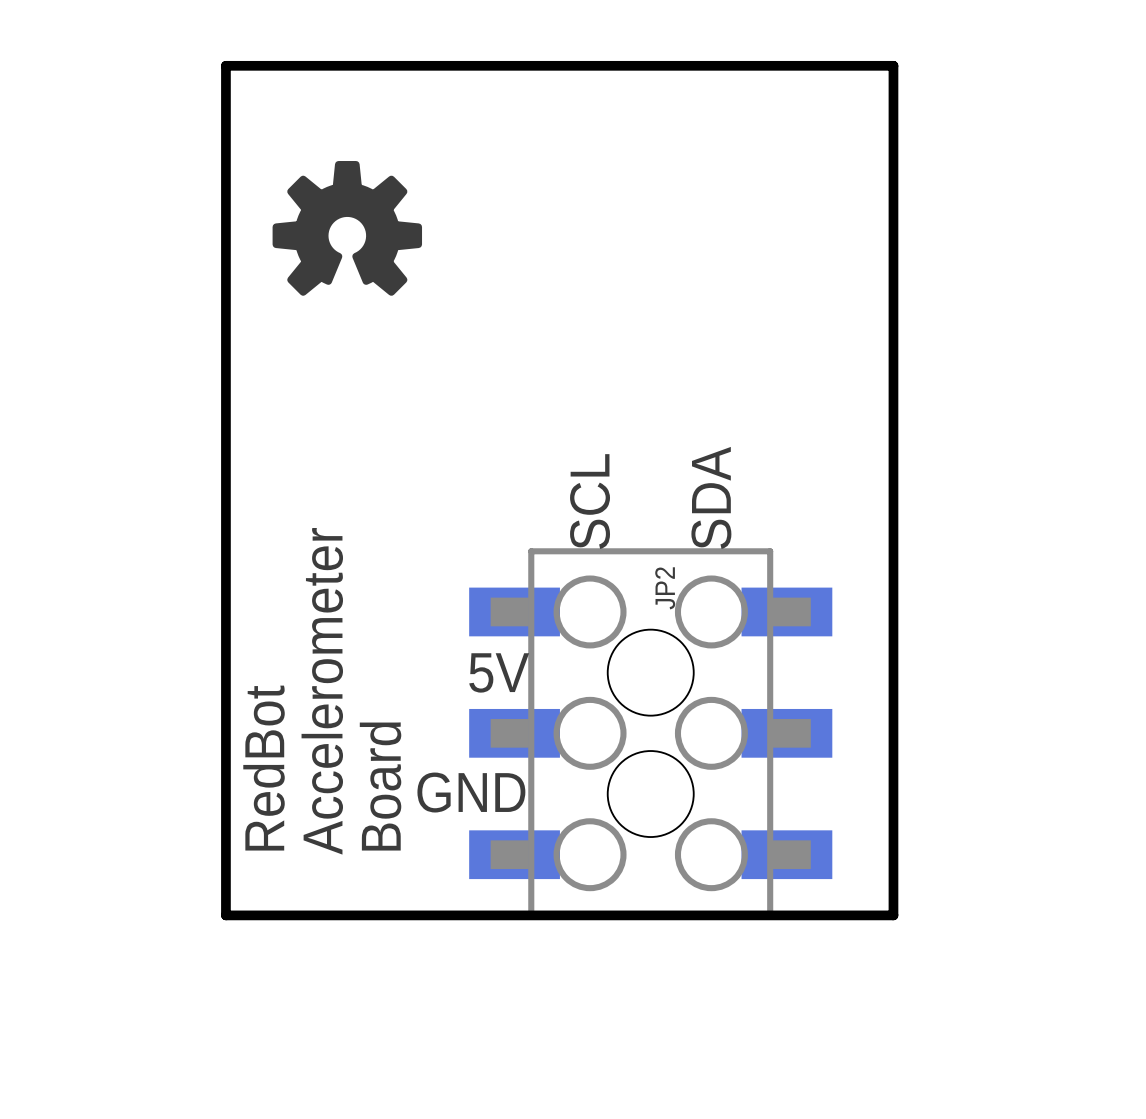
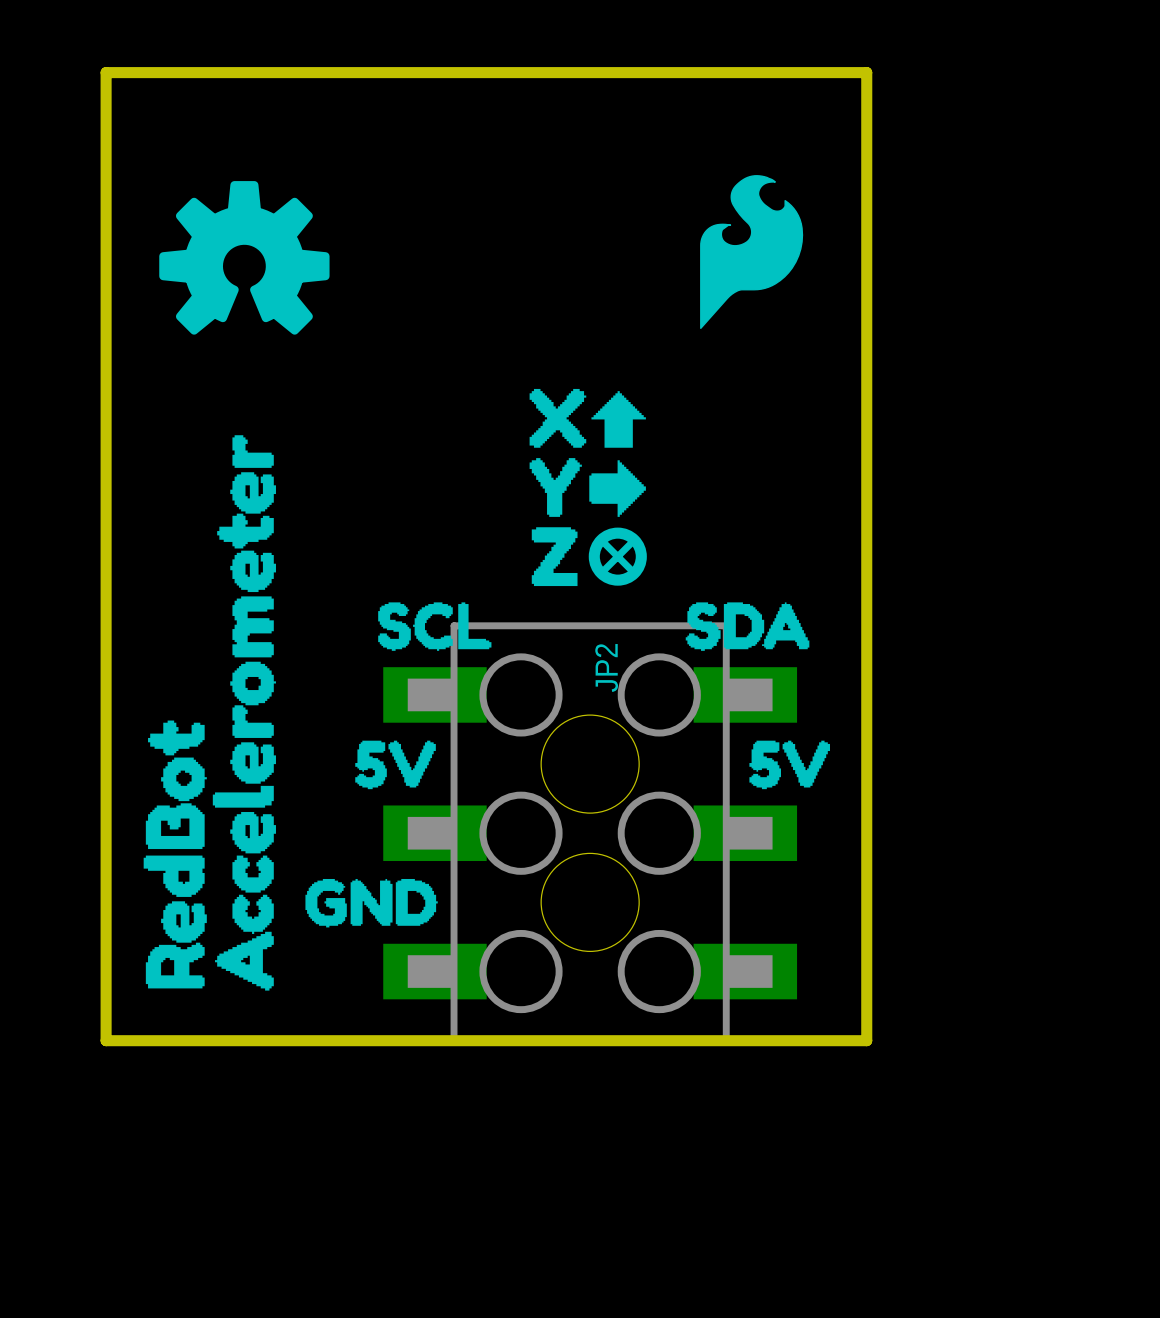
drawing: none -> [700, 175, 804, 330]
drawing: none -> [378, 388, 810, 651]
drawing: none -> [143, 435, 438, 991]
line: none -> (603, 542) (631, 570)
line: none -> (631, 542) (603, 570)
text: SDA (711, 497) -> none
text: SCL (590, 501) -> none
drawing: none -> [355, 740, 436, 790]
drawing: none -> [749, 740, 830, 790]
text: 5V (499, 672) -> none
text: Accelerometer (322, 691) -> none
text: RedBot (264, 768) -> none
text: Board (380, 786) -> none
text: GND (471, 792) -> none

